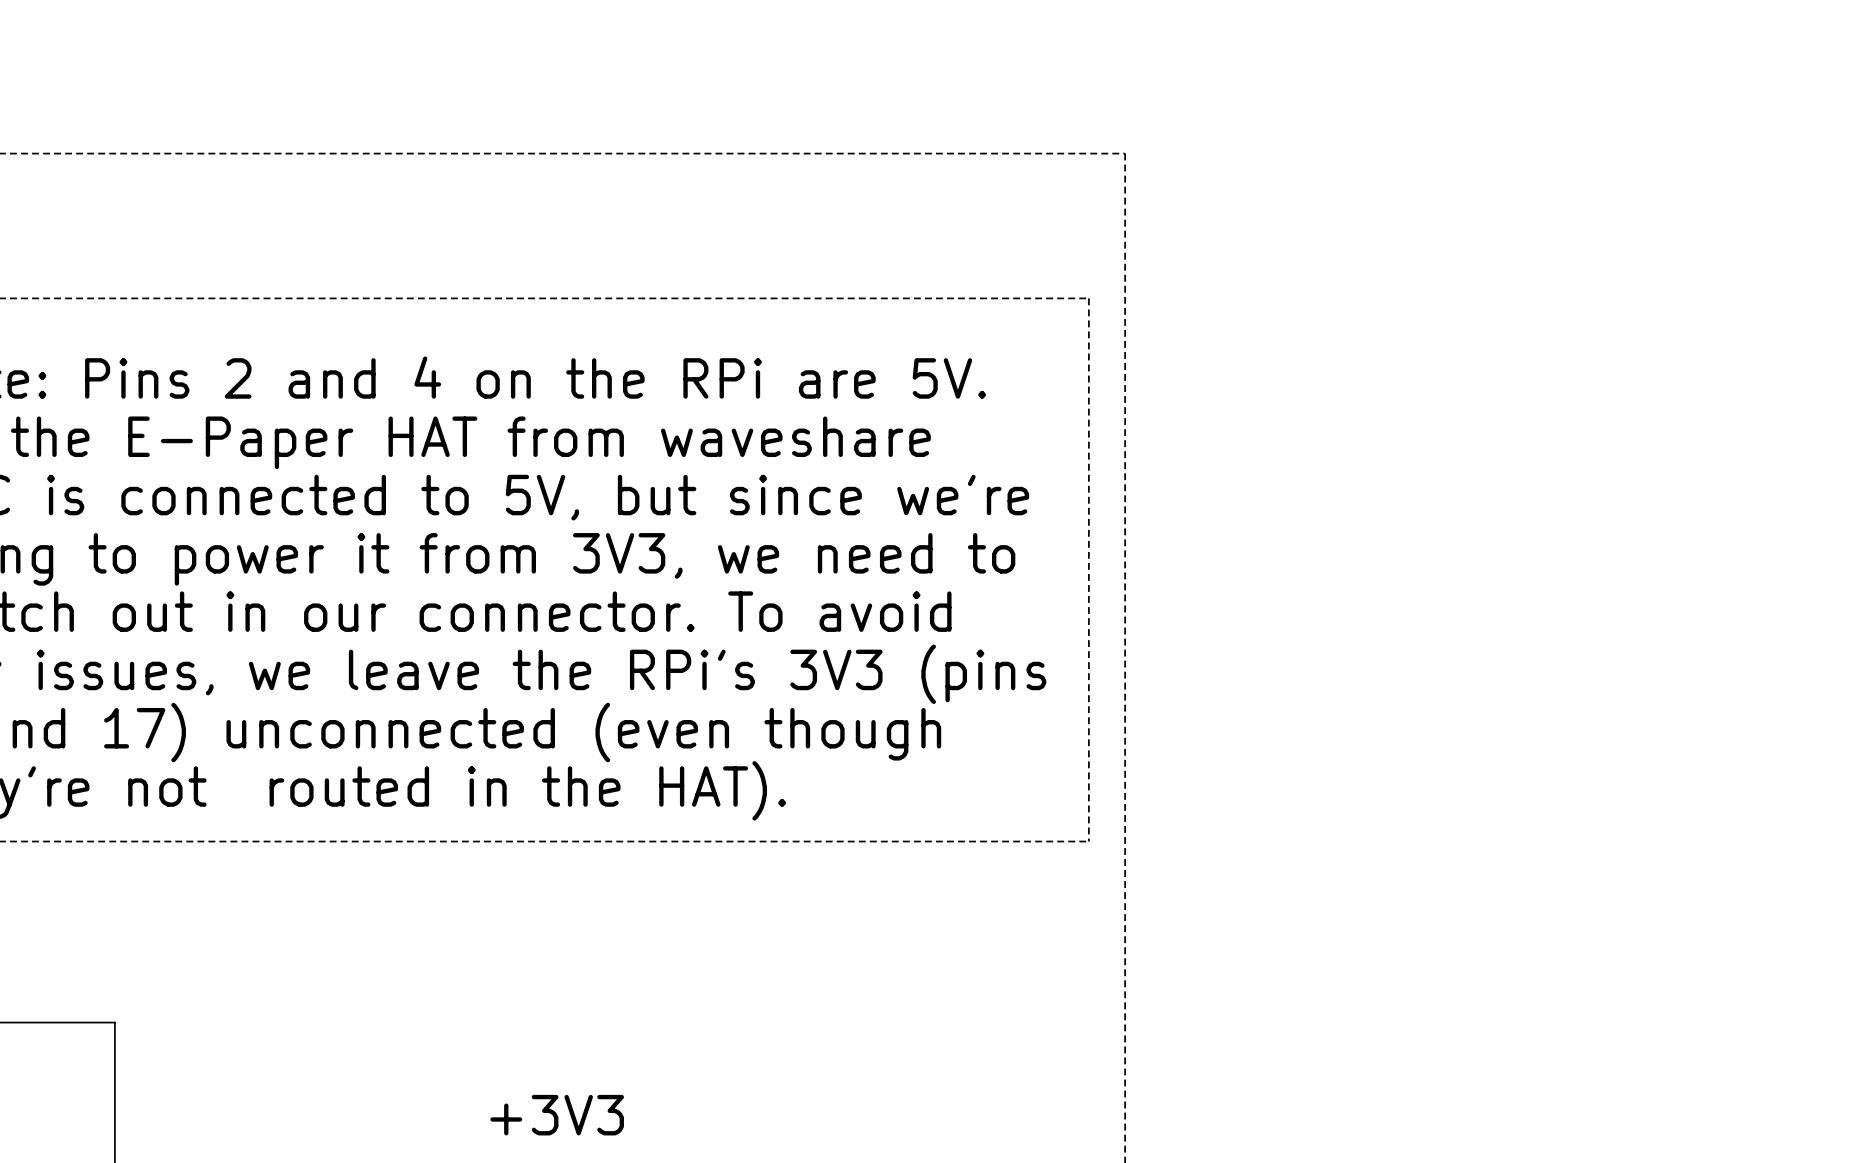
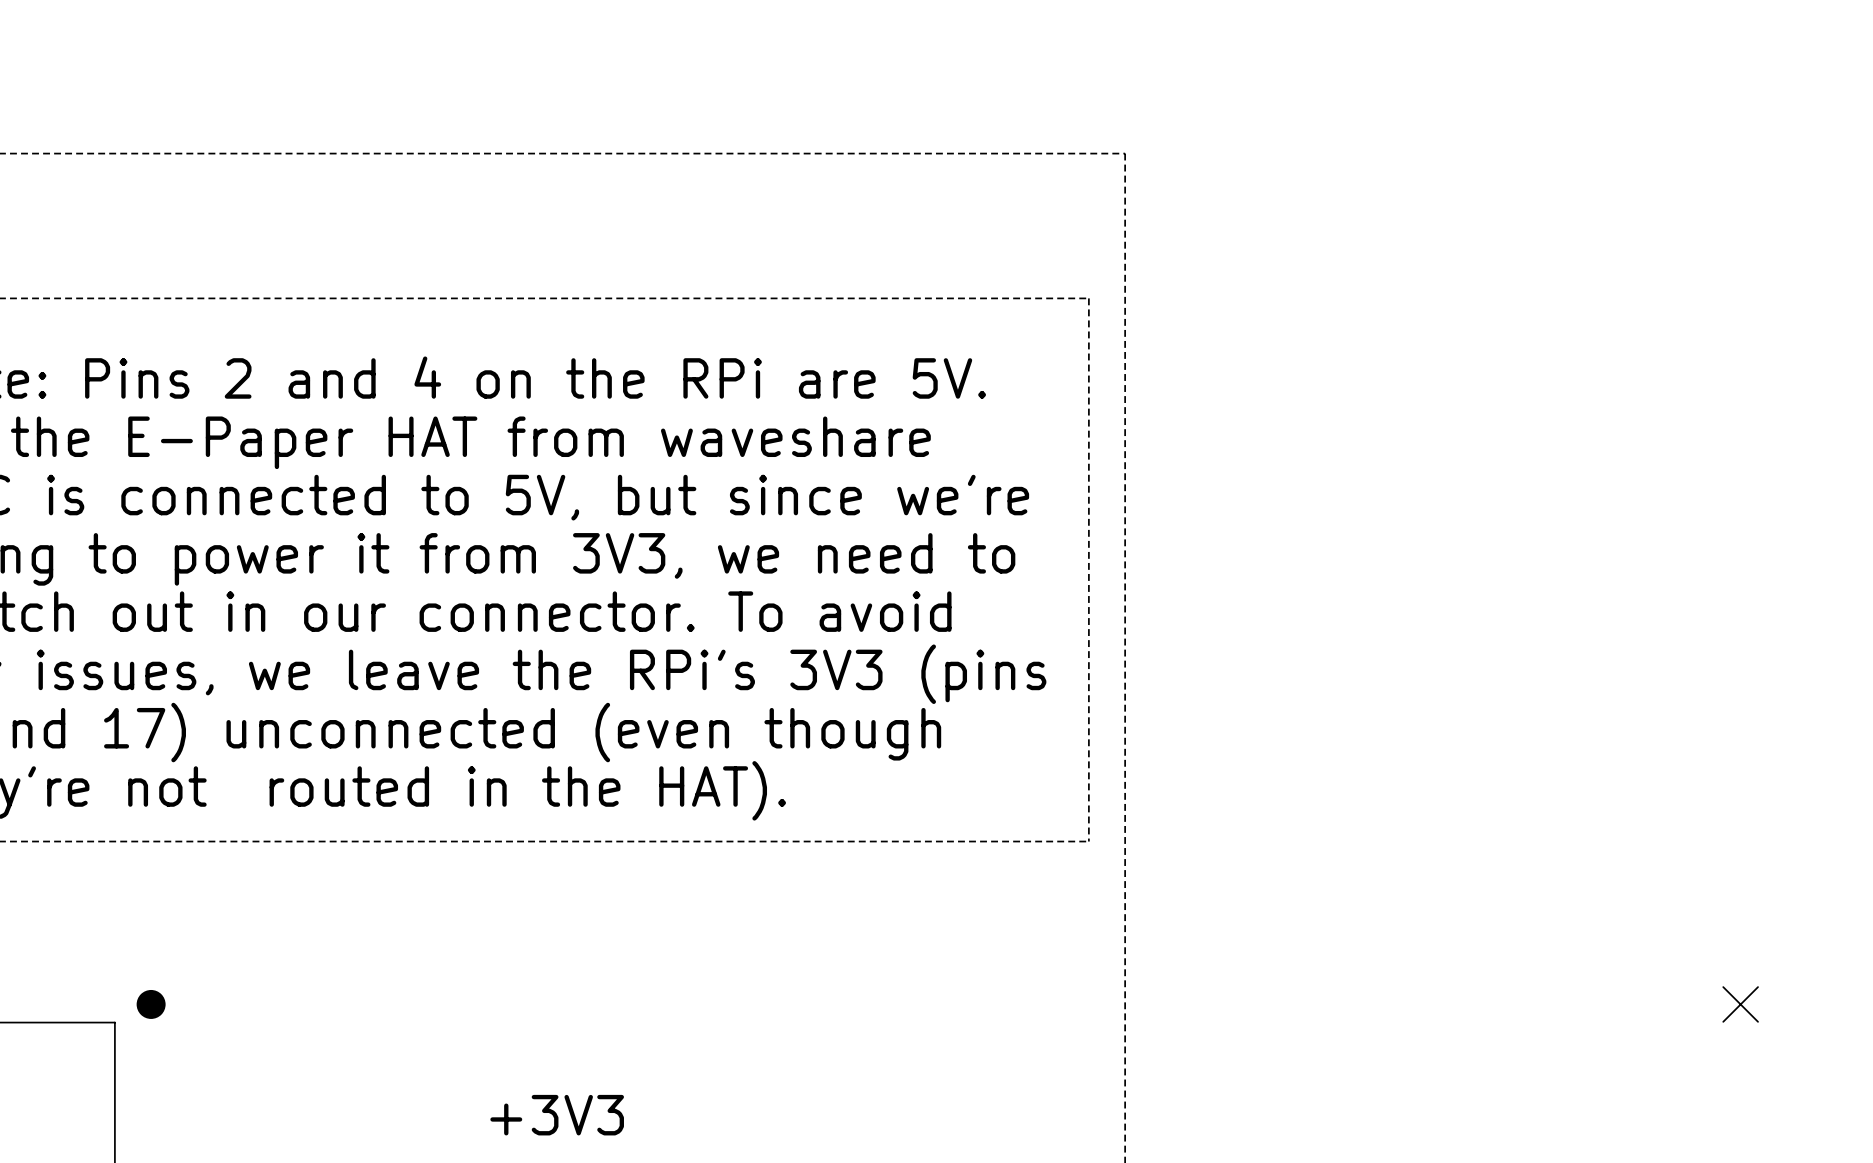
junction: none -> (151, 1004)
no-connect mark: none -> (1740, 1004)

